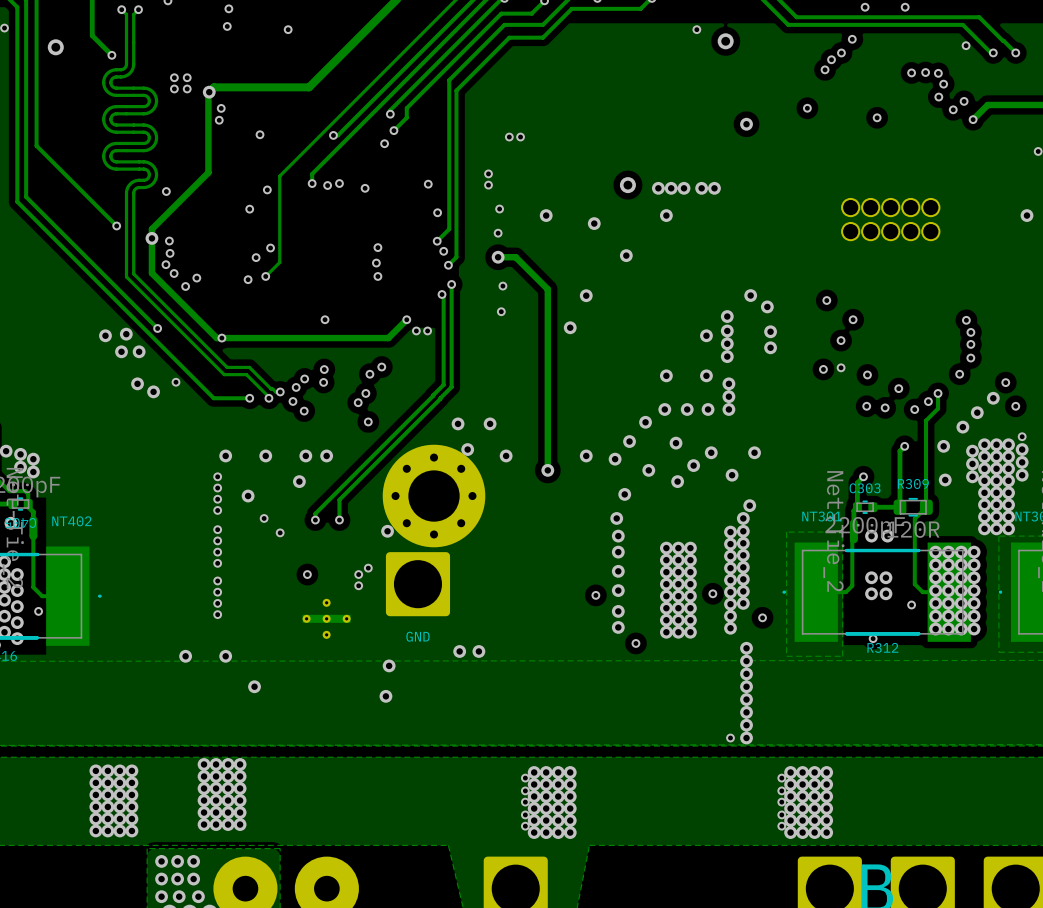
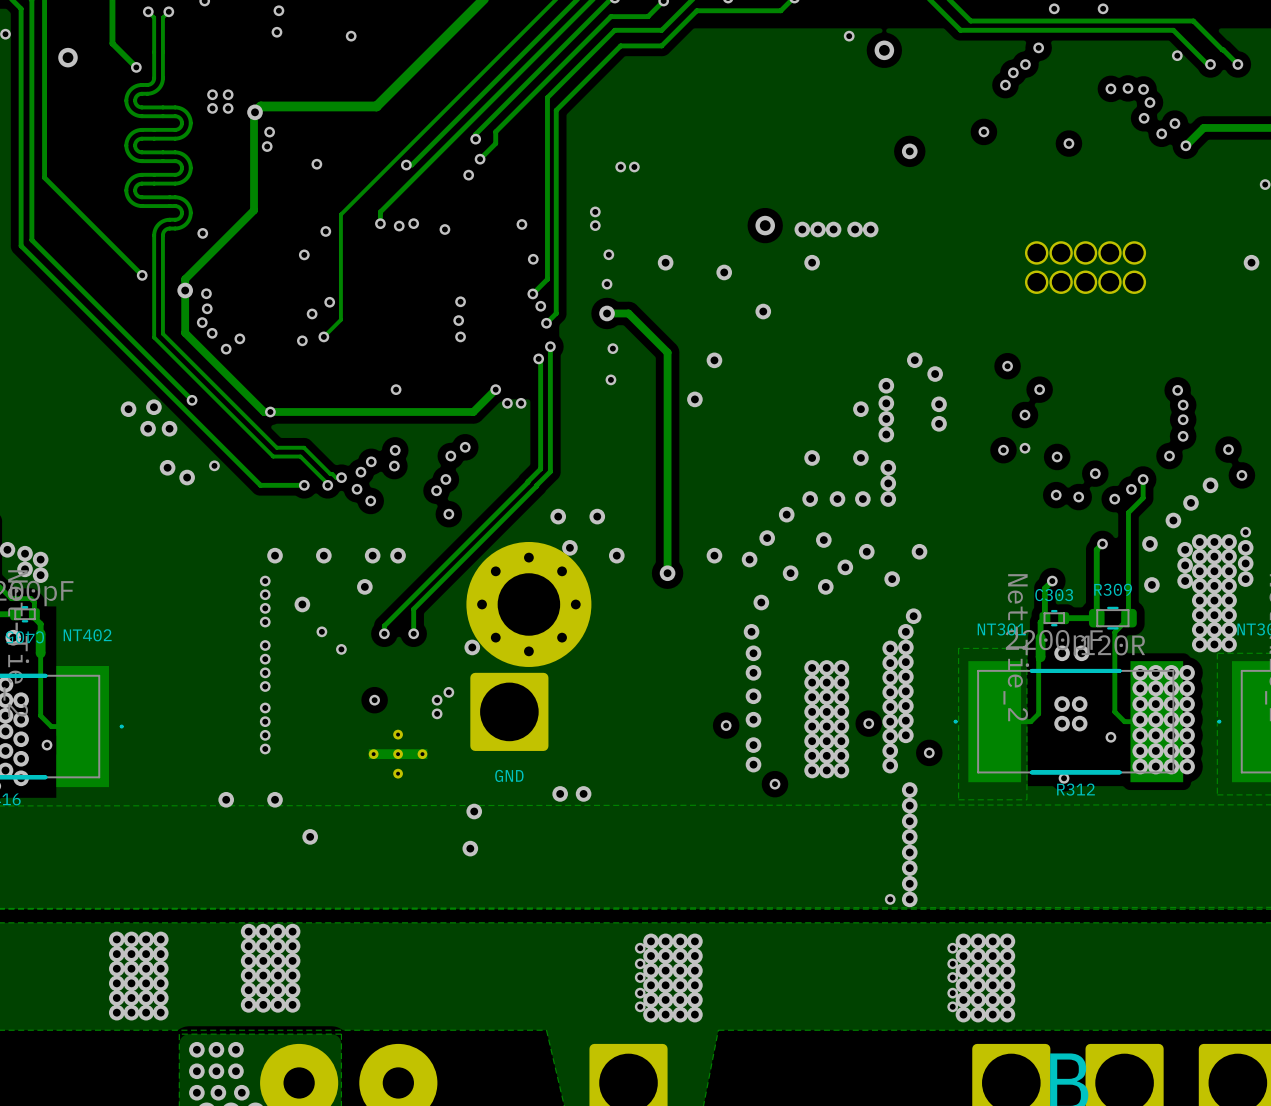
via: none -> (1228, 449)
via: (1005, 382) -> none
via: none -> (1241, 475)
via: (1015, 406) -> none

